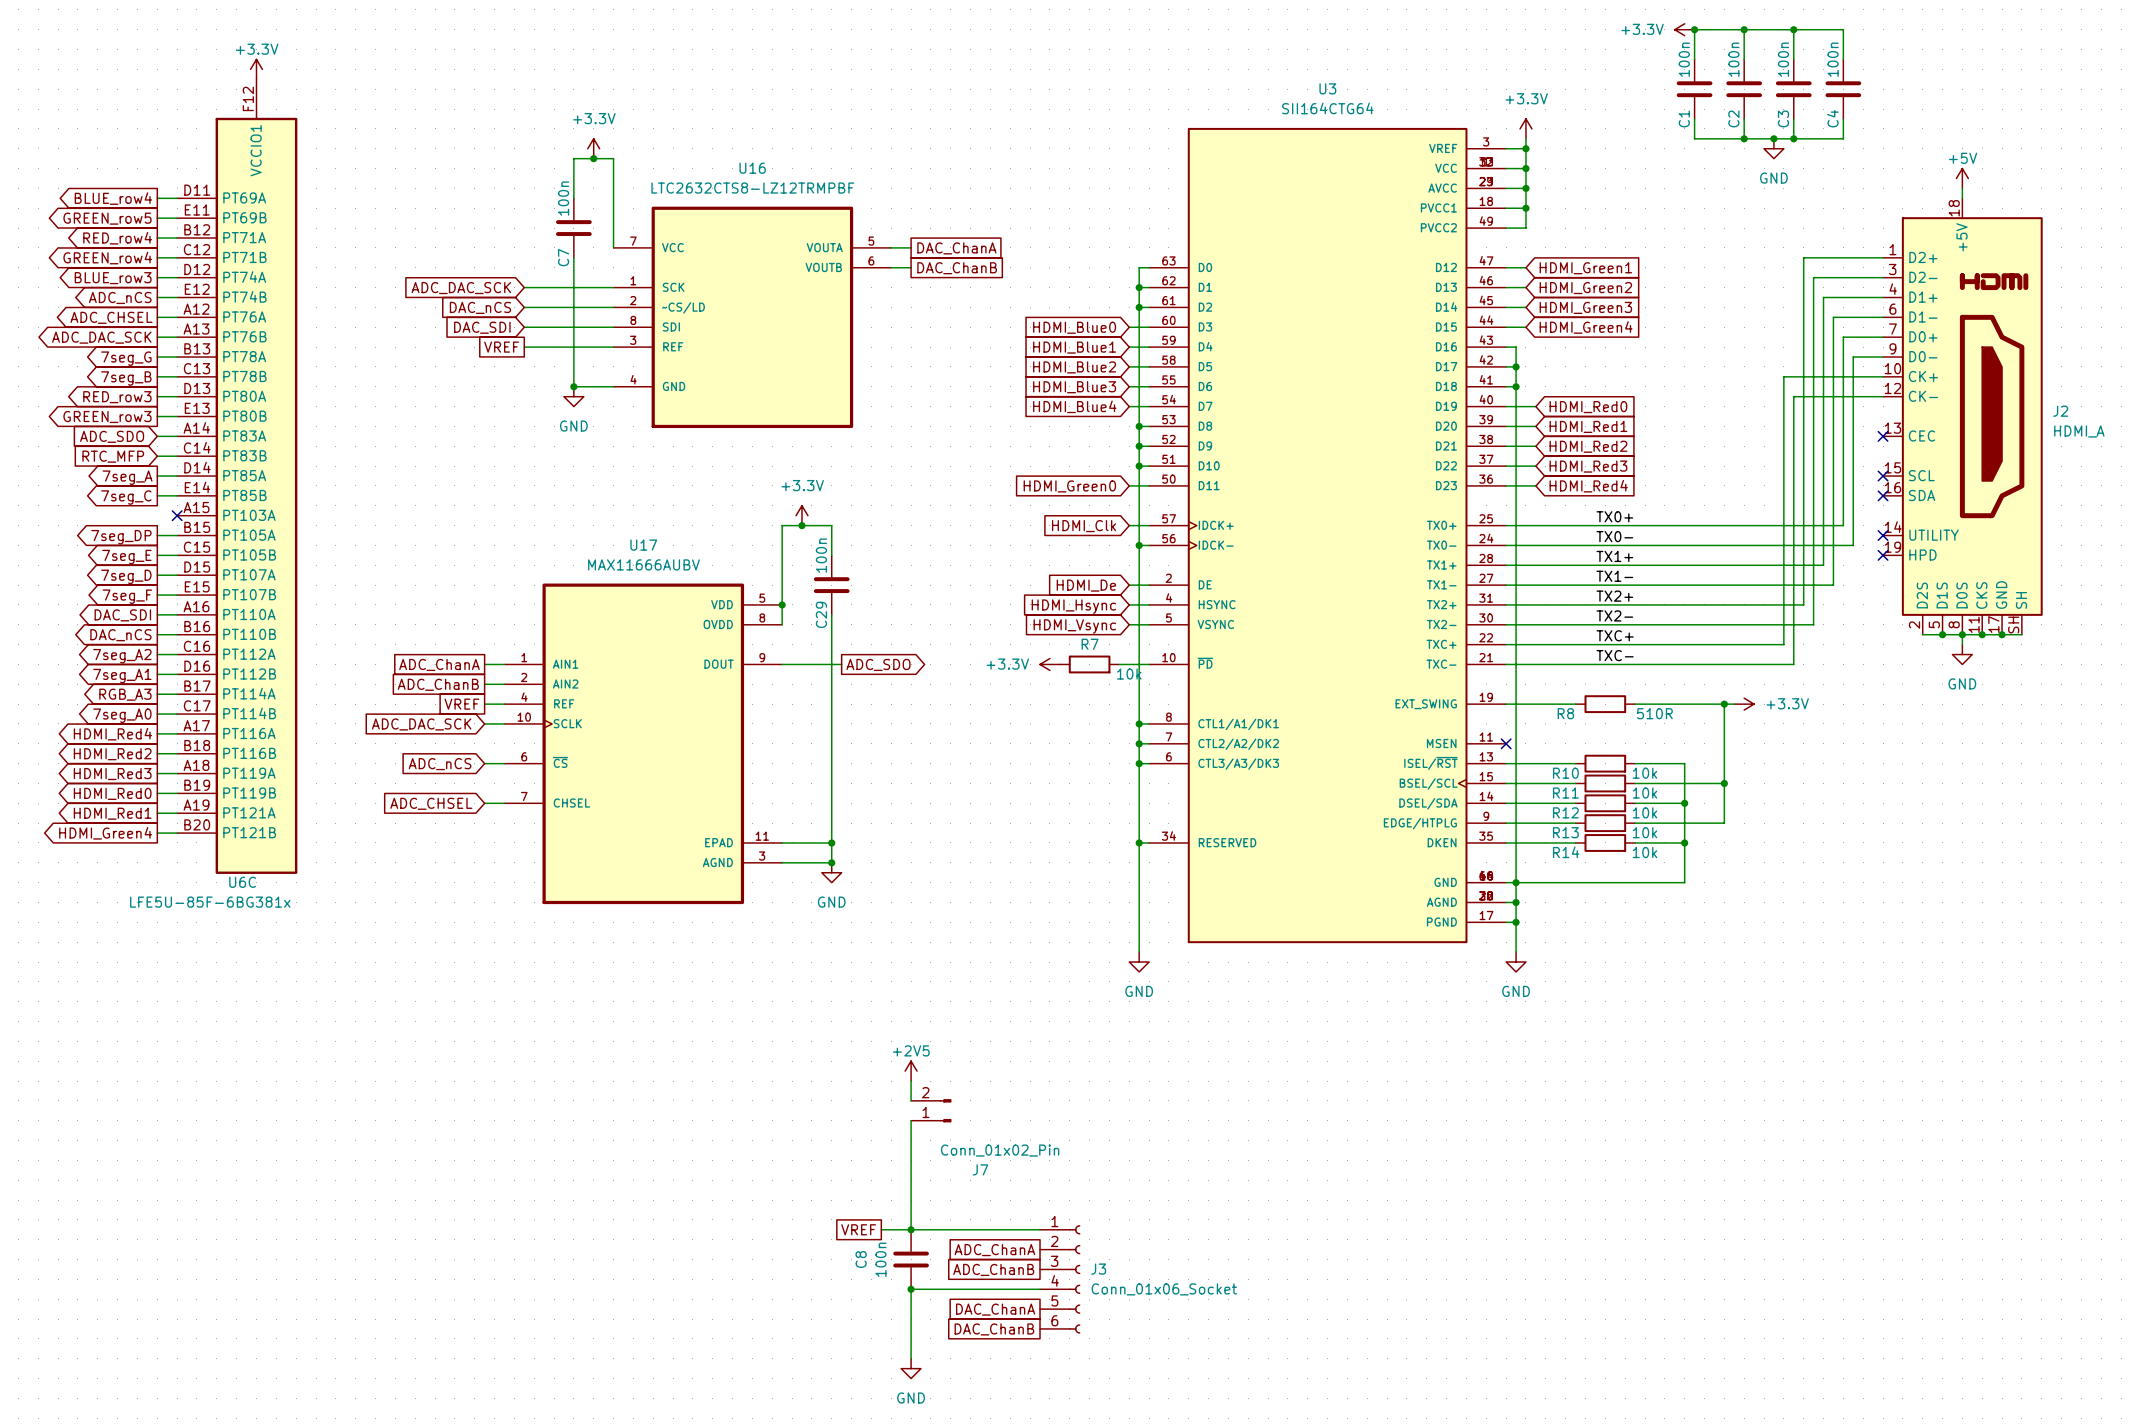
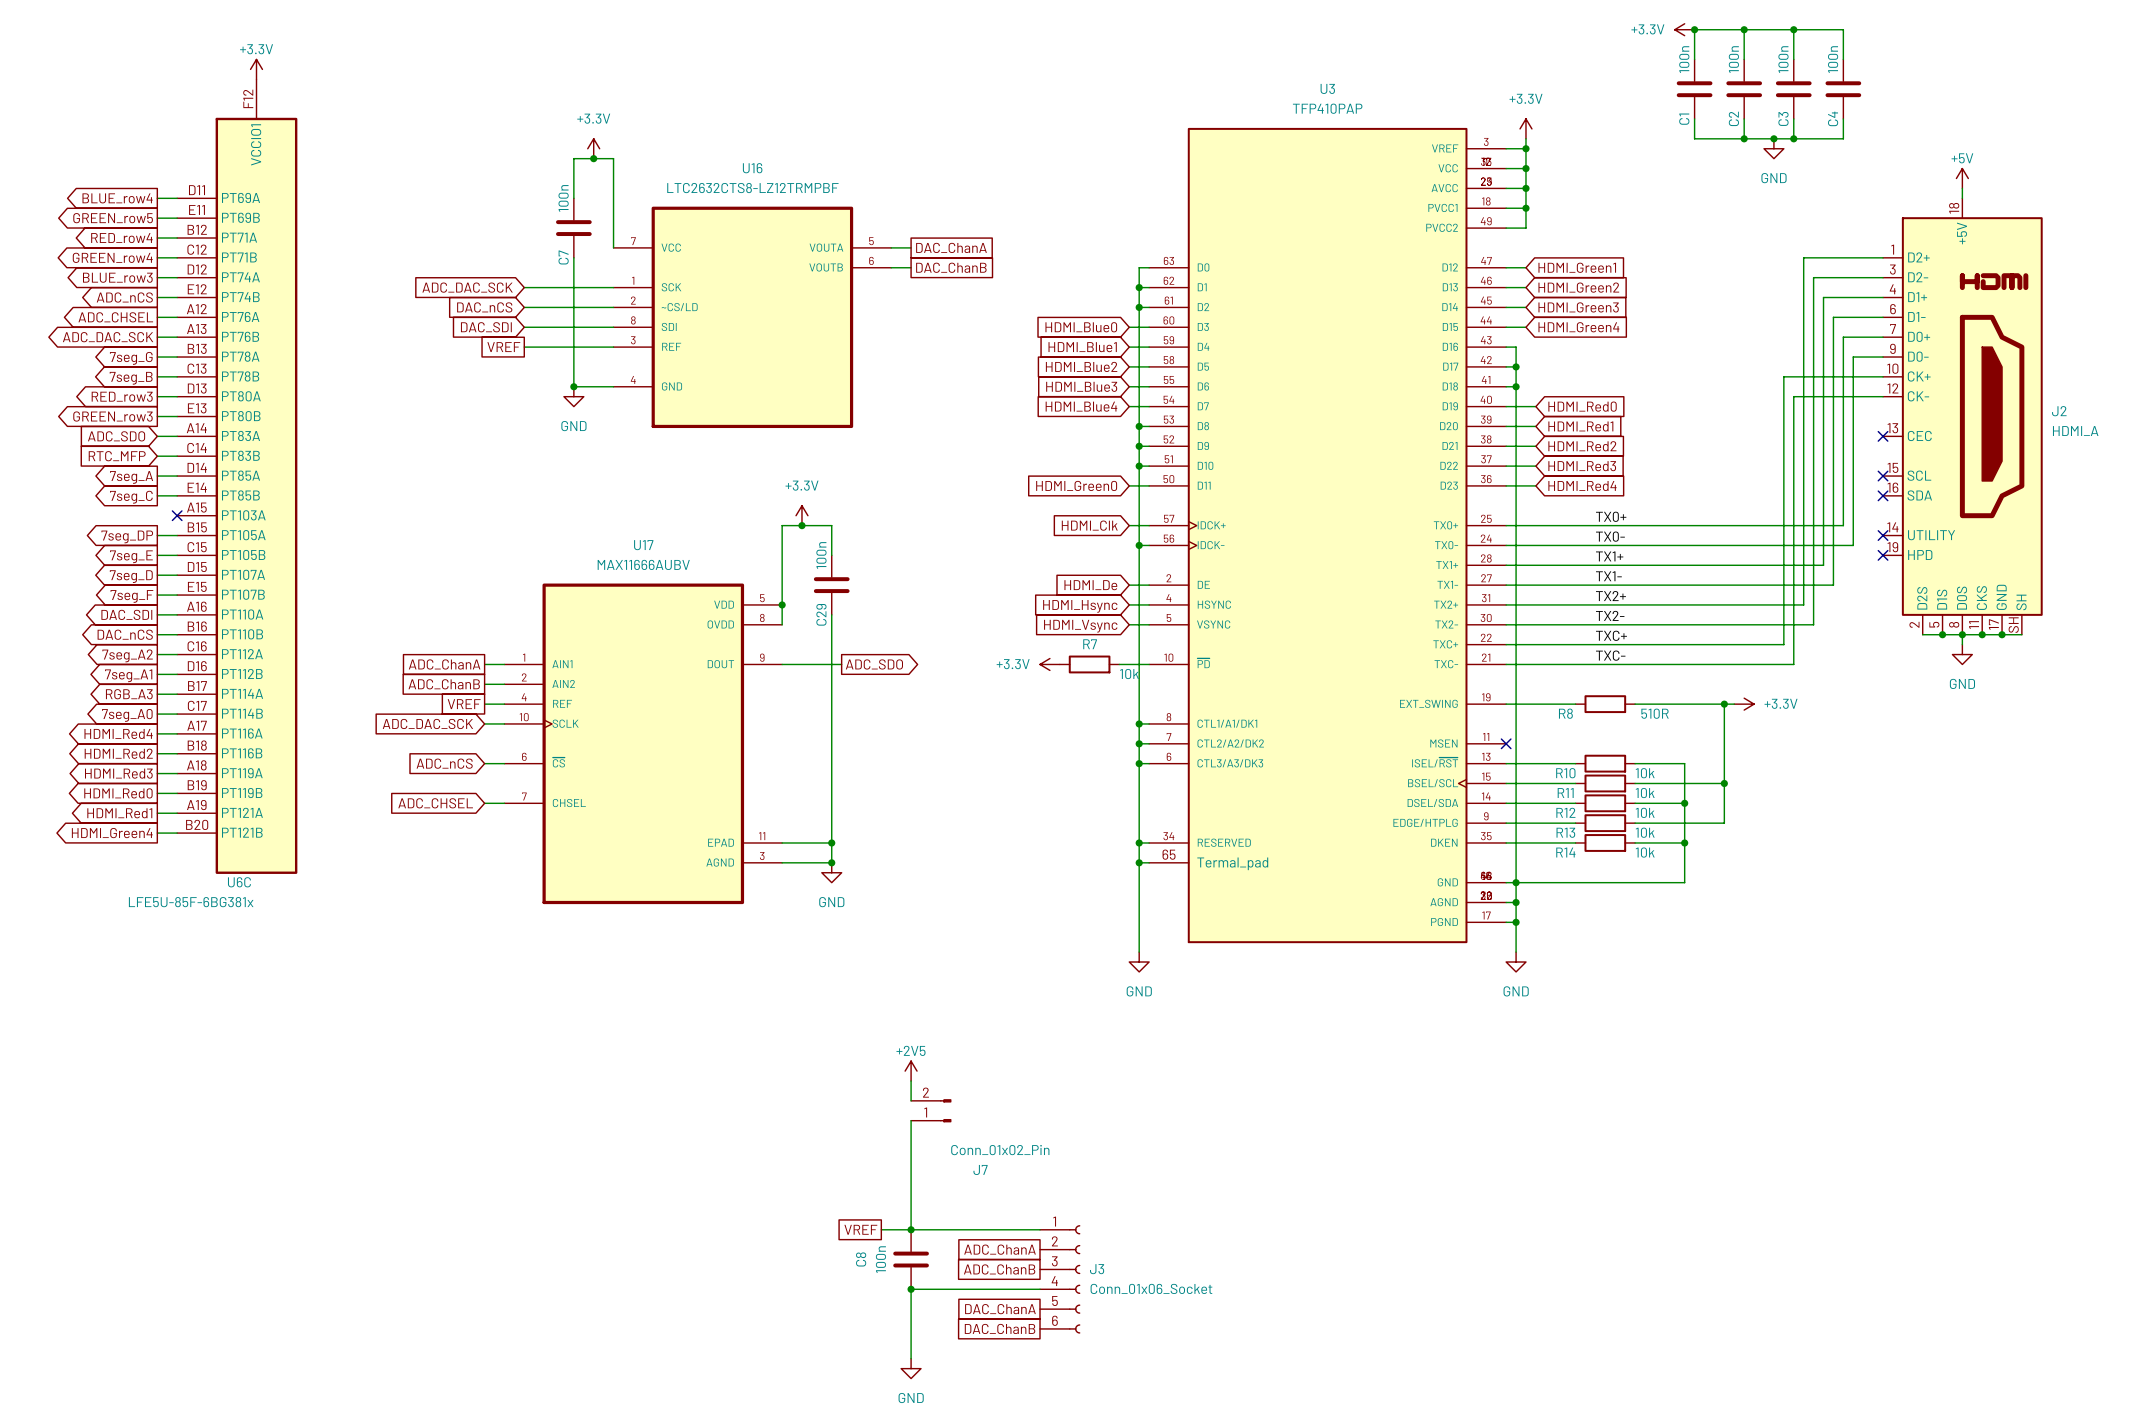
U3 value: SII164CTG64 (1327, 108) -> TFP410PAP (1327, 108)
U3 symbol: [1149, 127, 1507, 944] -> [1149, 127, 1507, 944]
wire: none -> (1139, 862) (1149, 862)
junction: none -> (1139, 862)

